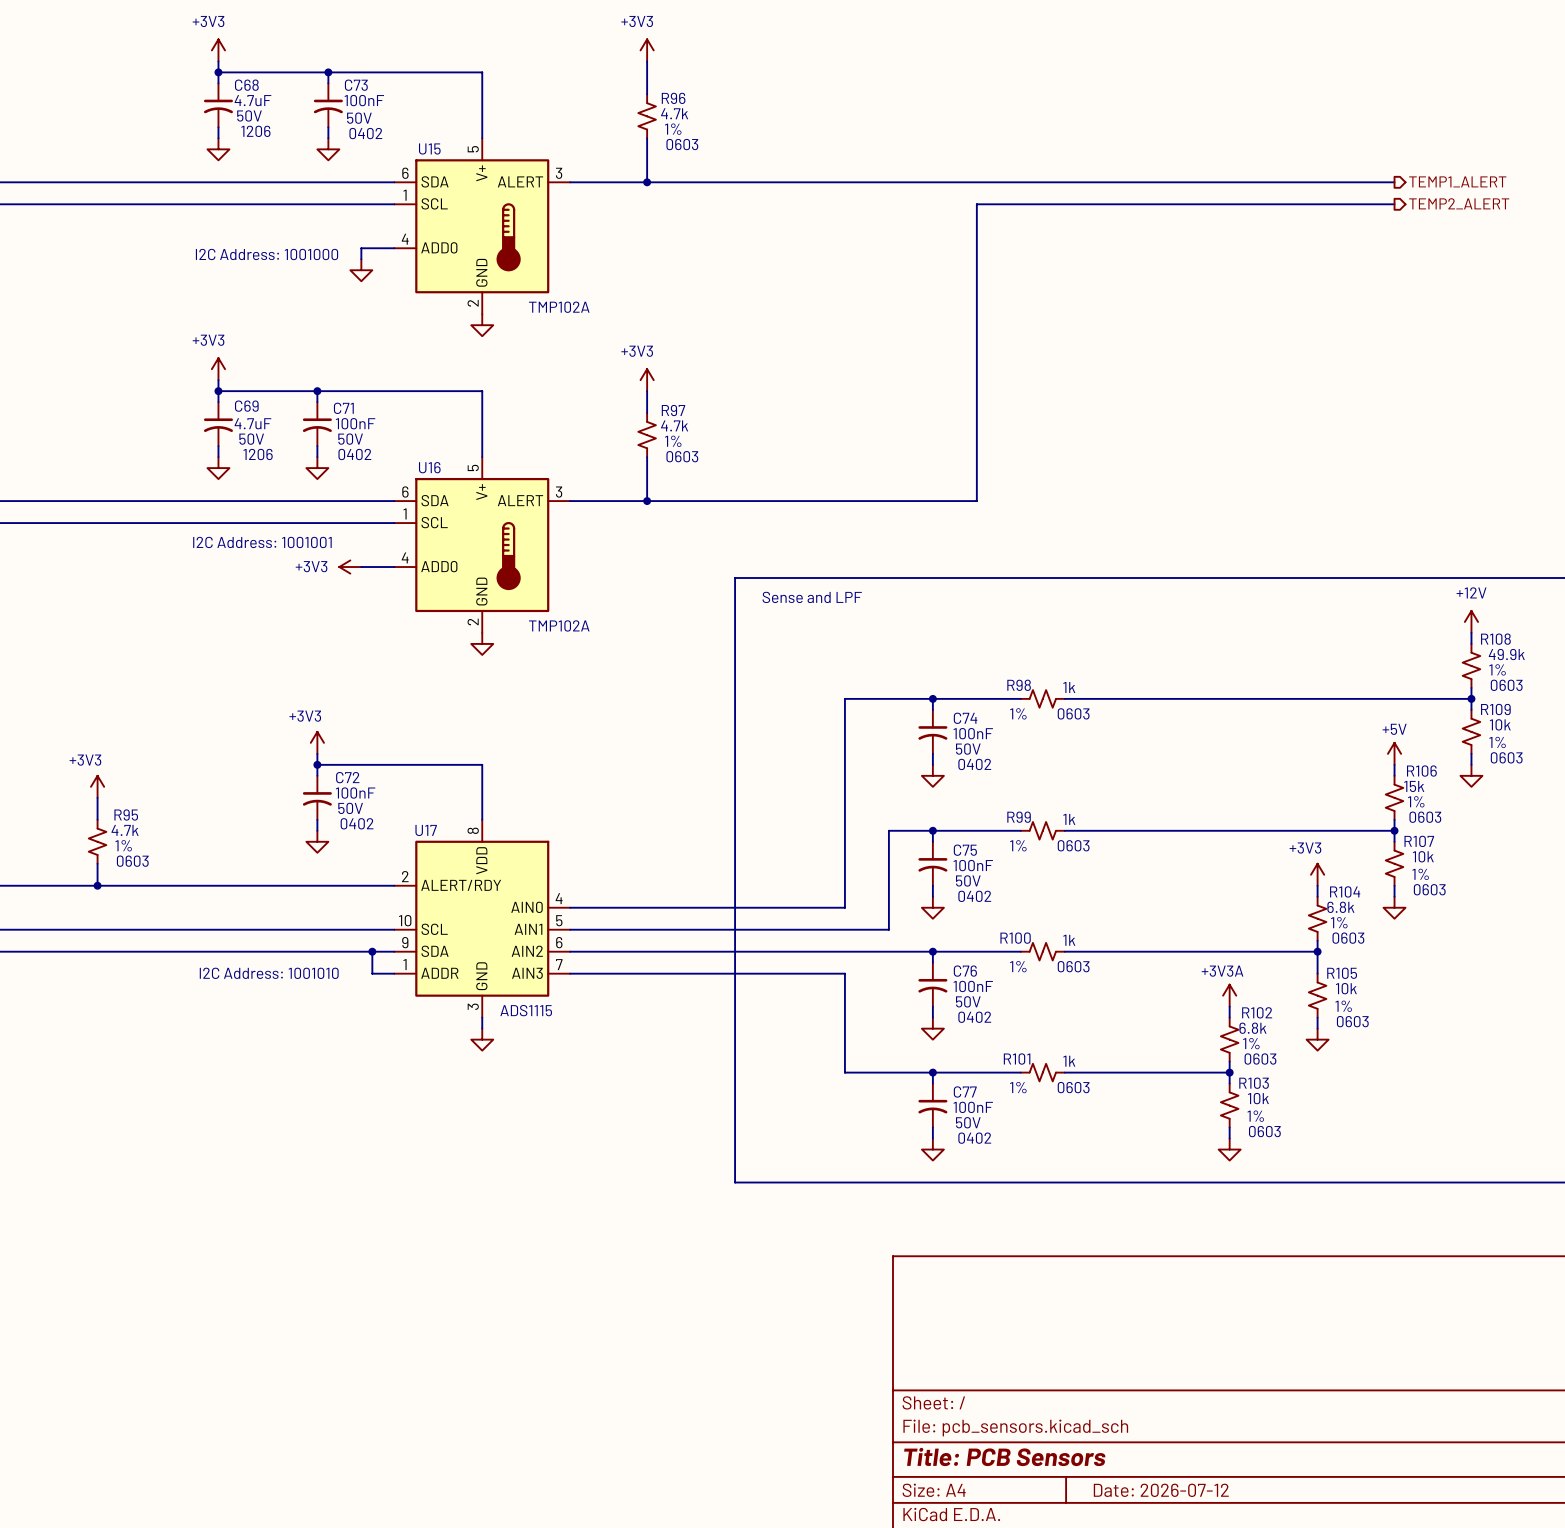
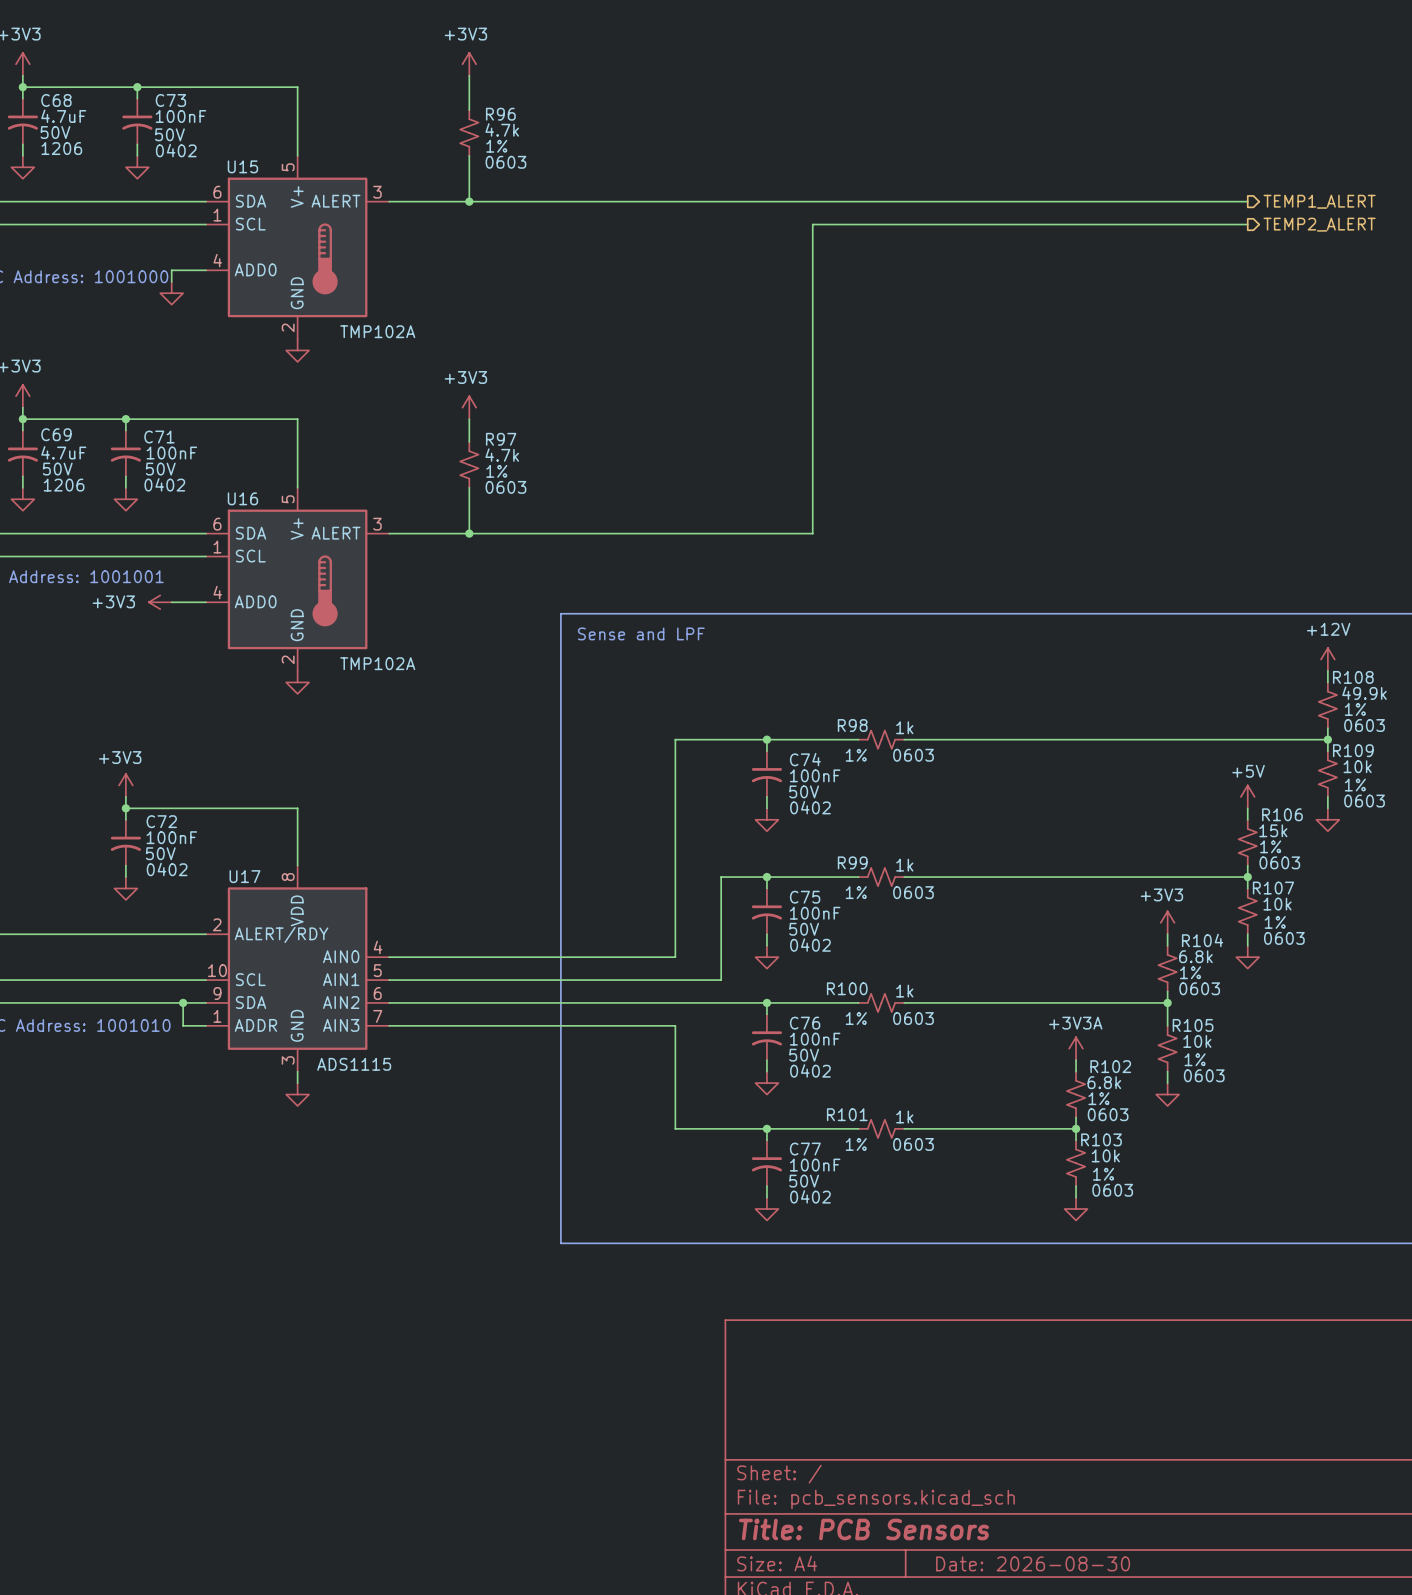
title block: Date: 2026-07-12 (1161, 1490) -> Date: 2026-08-30 (1033, 1563)

